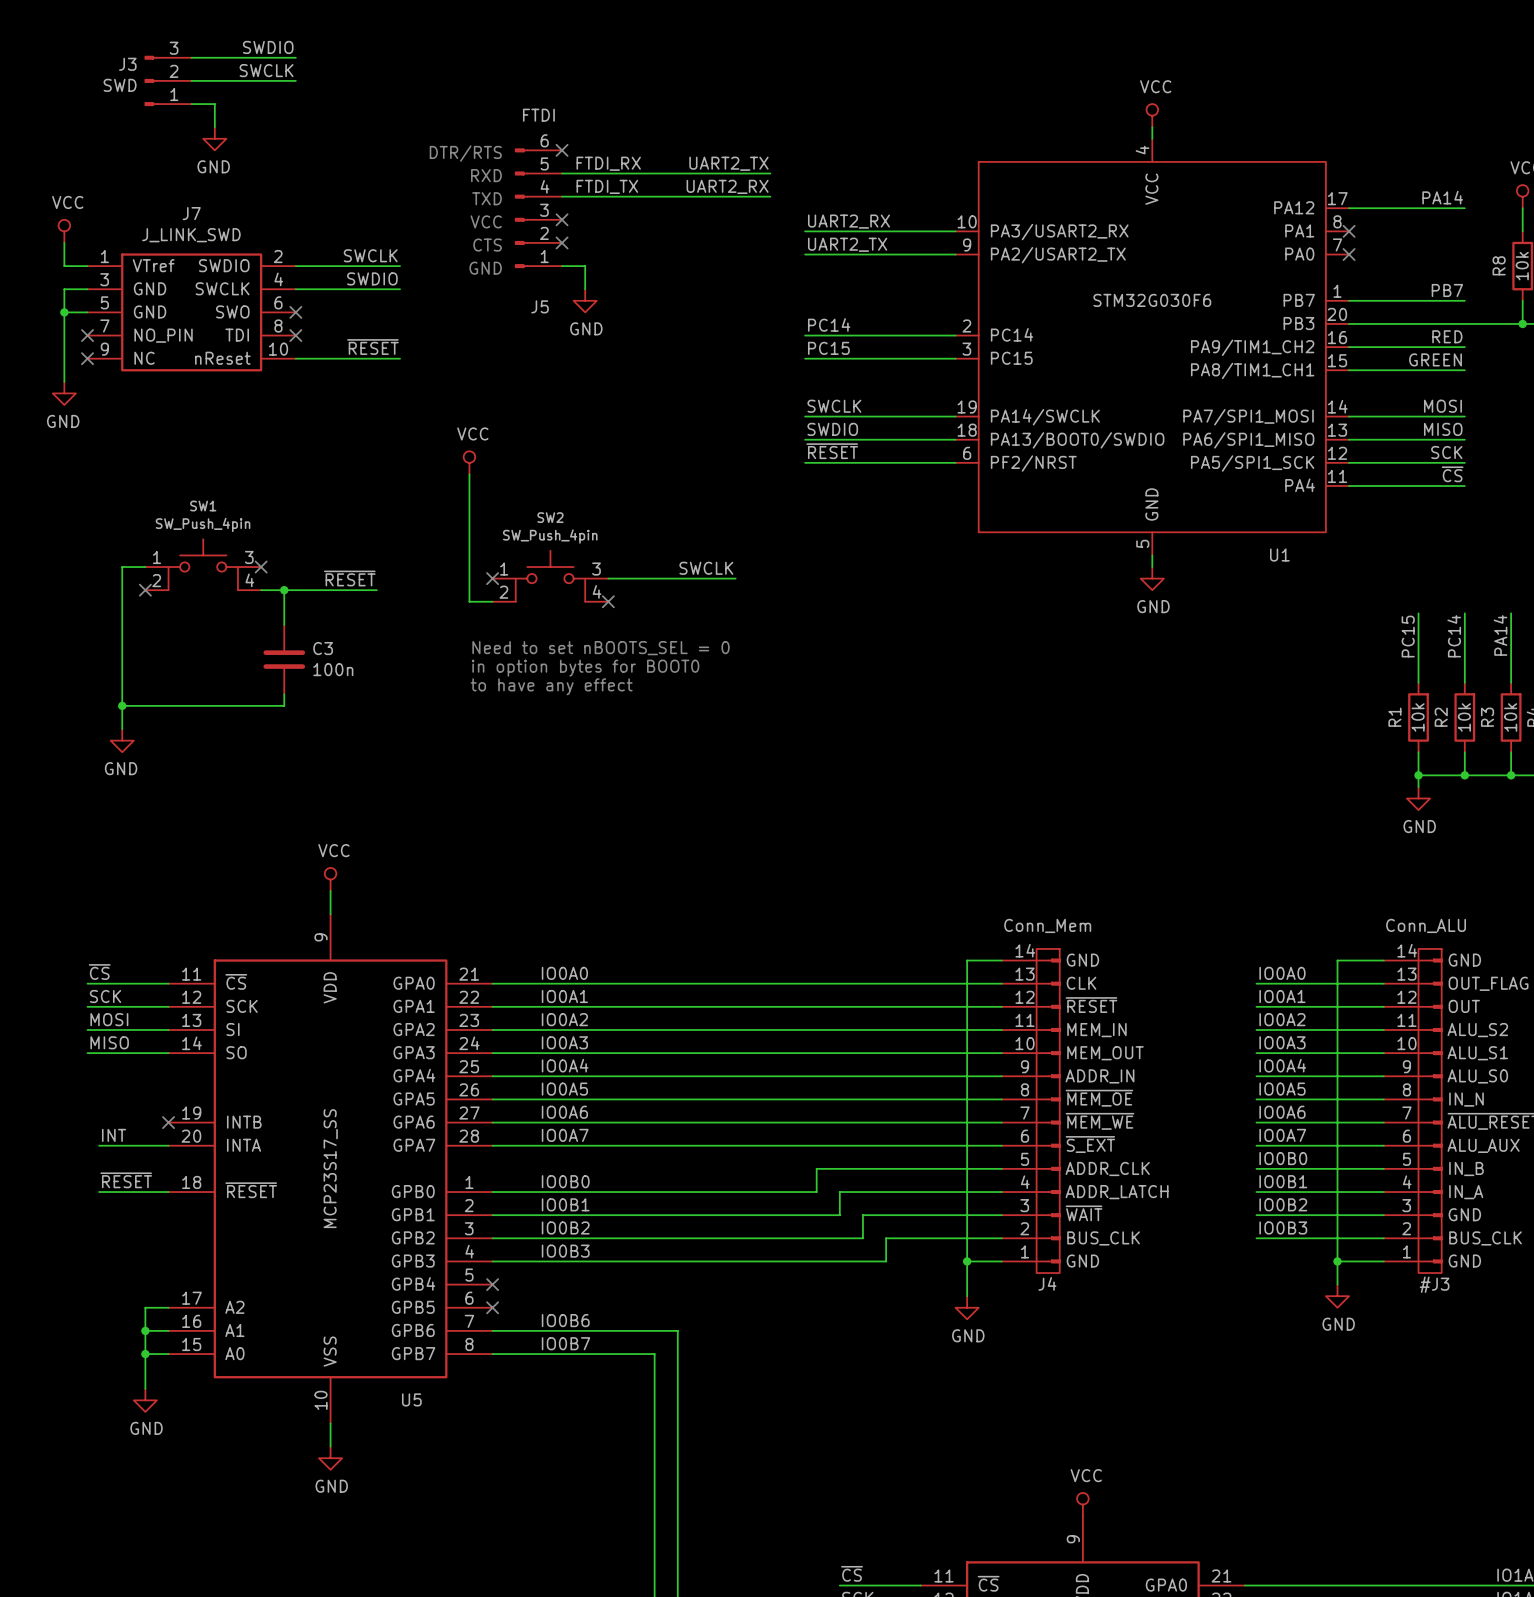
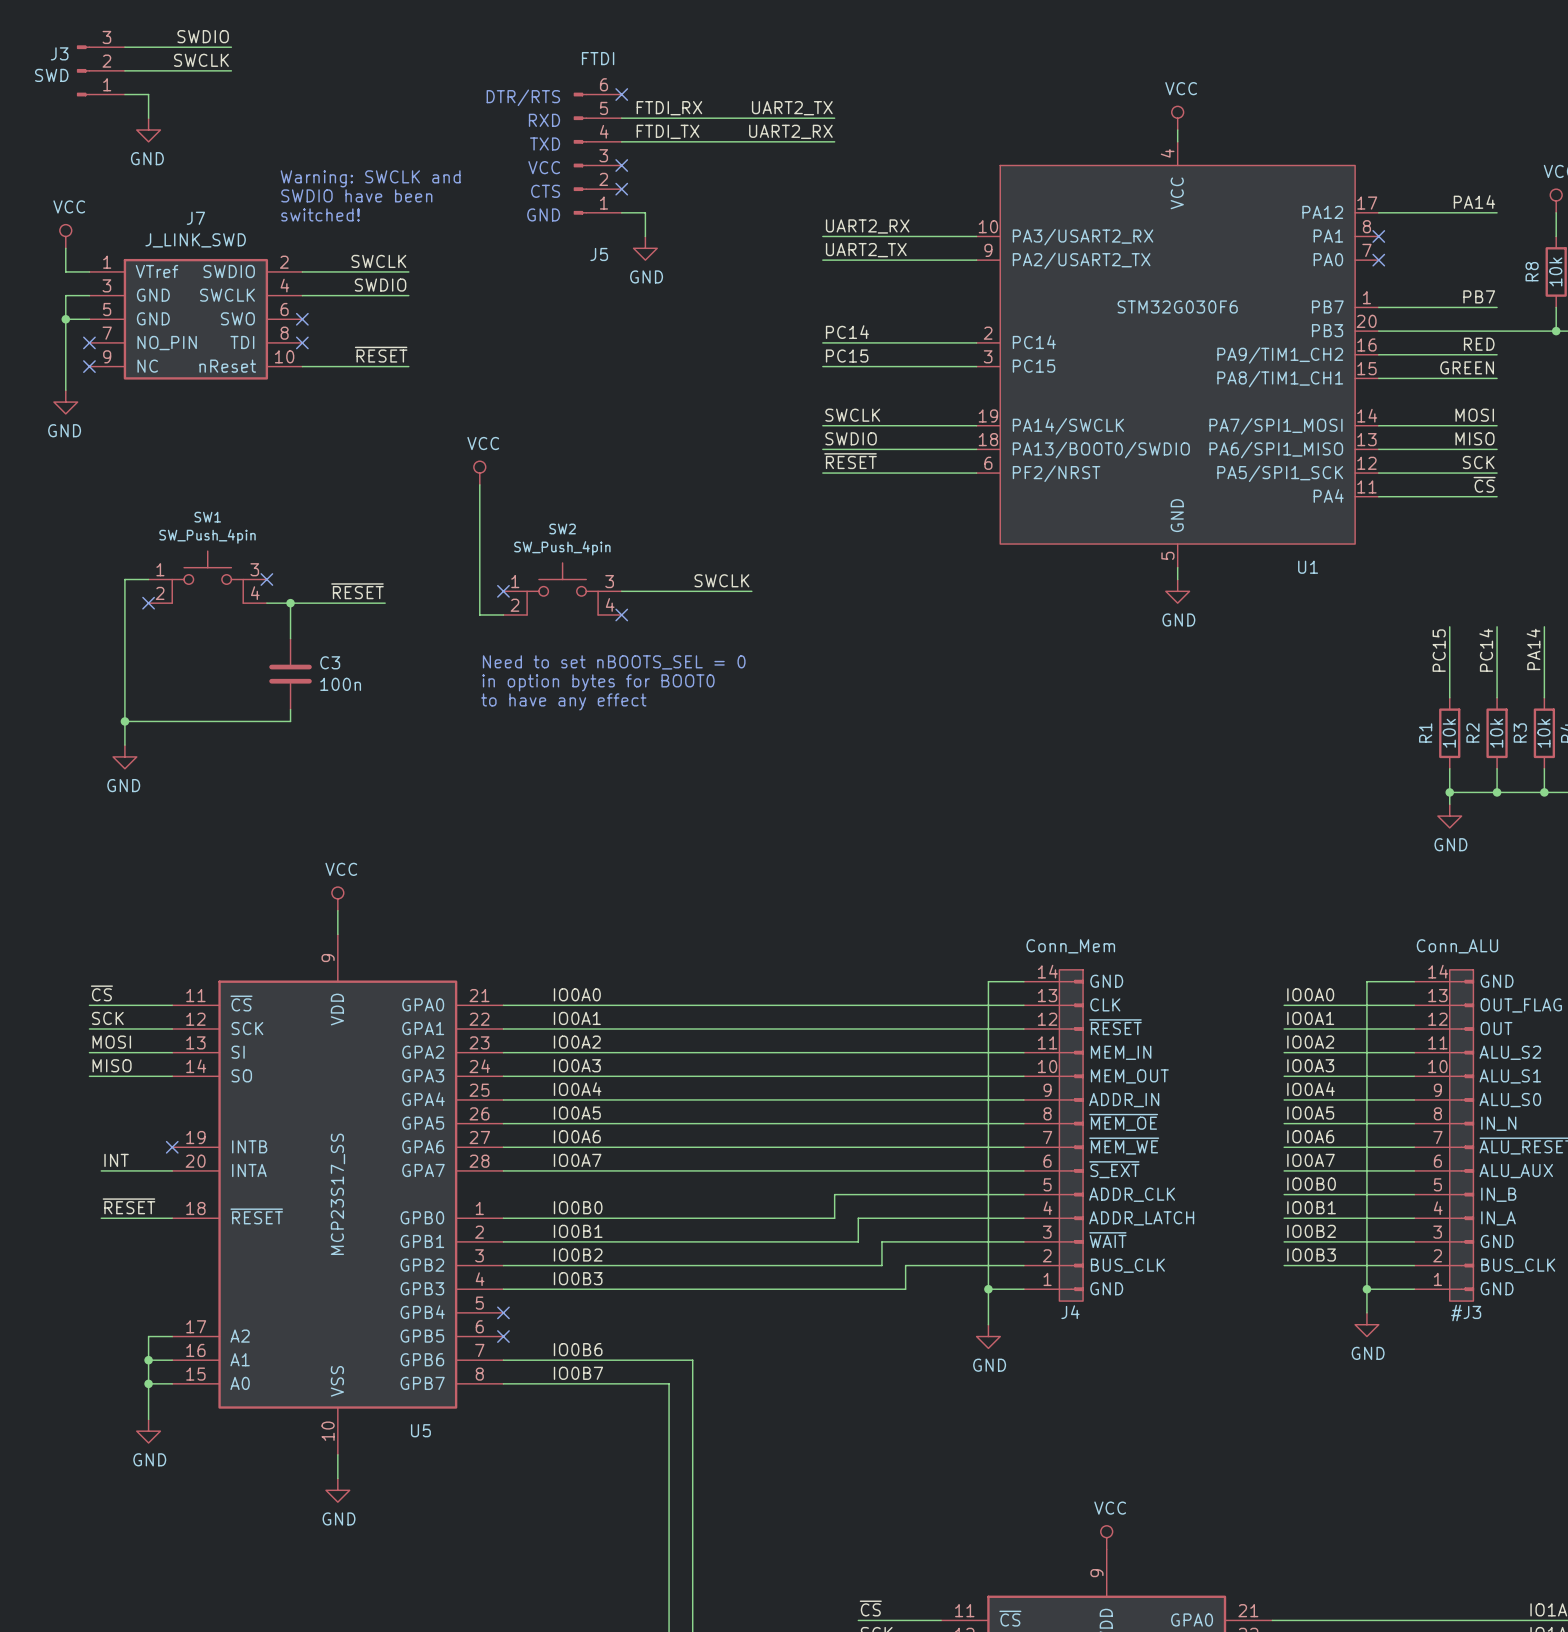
label position: SWDIO (268, 47) -> SWDIO (203, 36)
wire: (191, 57) (295, 57) -> (124, 47) (231, 47)
label position: SWCLK (266, 70) -> SWCLK (201, 60)
J3 position: (168, 80) -> (100, 70)
wire: (191, 80) (295, 80) -> (124, 70) (231, 70)
no-connect mark: none -> (621, 94)
wire: (191, 104) (214, 104) (214, 127) -> (124, 94) (148, 94) (148, 118)
power symbol position: GND (214, 138) -> GND (148, 130)
no-connect mark: (562, 150) -> none
text position: DTR/RTS (465, 153) -> DTR/RTS (523, 97)
no-connect mark: none -> (621, 165)
label position: FTDI_RX (608, 163) -> FTDI_RX (669, 108)
label position: UART2_TX (728, 163) -> UART2_TX (792, 108)
wire: (562, 173) (770, 173) -> (621, 118) (834, 118)
text: none -> Warning: SWCLK and (370, 178)
text position: RXD (486, 175) -> RXD (544, 120)
no-connect mark: none -> (621, 189)
label position: FTDI_TX (607, 186) -> FTDI_TX (668, 131)
label position: UART2_RX (727, 186) -> UART2_RX (790, 131)
text: none -> SWDIO have been (356, 195)
wire: (562, 196) (770, 196) -> (621, 141) (834, 141)
text position: TXD (487, 198) -> TXD (545, 143)
J5 position: (538, 208) -> (597, 153)
text: none -> switched! (320, 214)
no-connect mark: (562, 219) -> none
text position: VCC (486, 221) -> VCC (544, 167)
no-connect mark: (562, 242) -> none
text position: CTS (487, 245) -> CTS (545, 191)
wire: (562, 266) (585, 266) (585, 289) -> (621, 212) (645, 212) (645, 236)
text position: GND (485, 268) -> GND (543, 214)
power symbol position: GND (585, 300) -> GND (645, 248)

